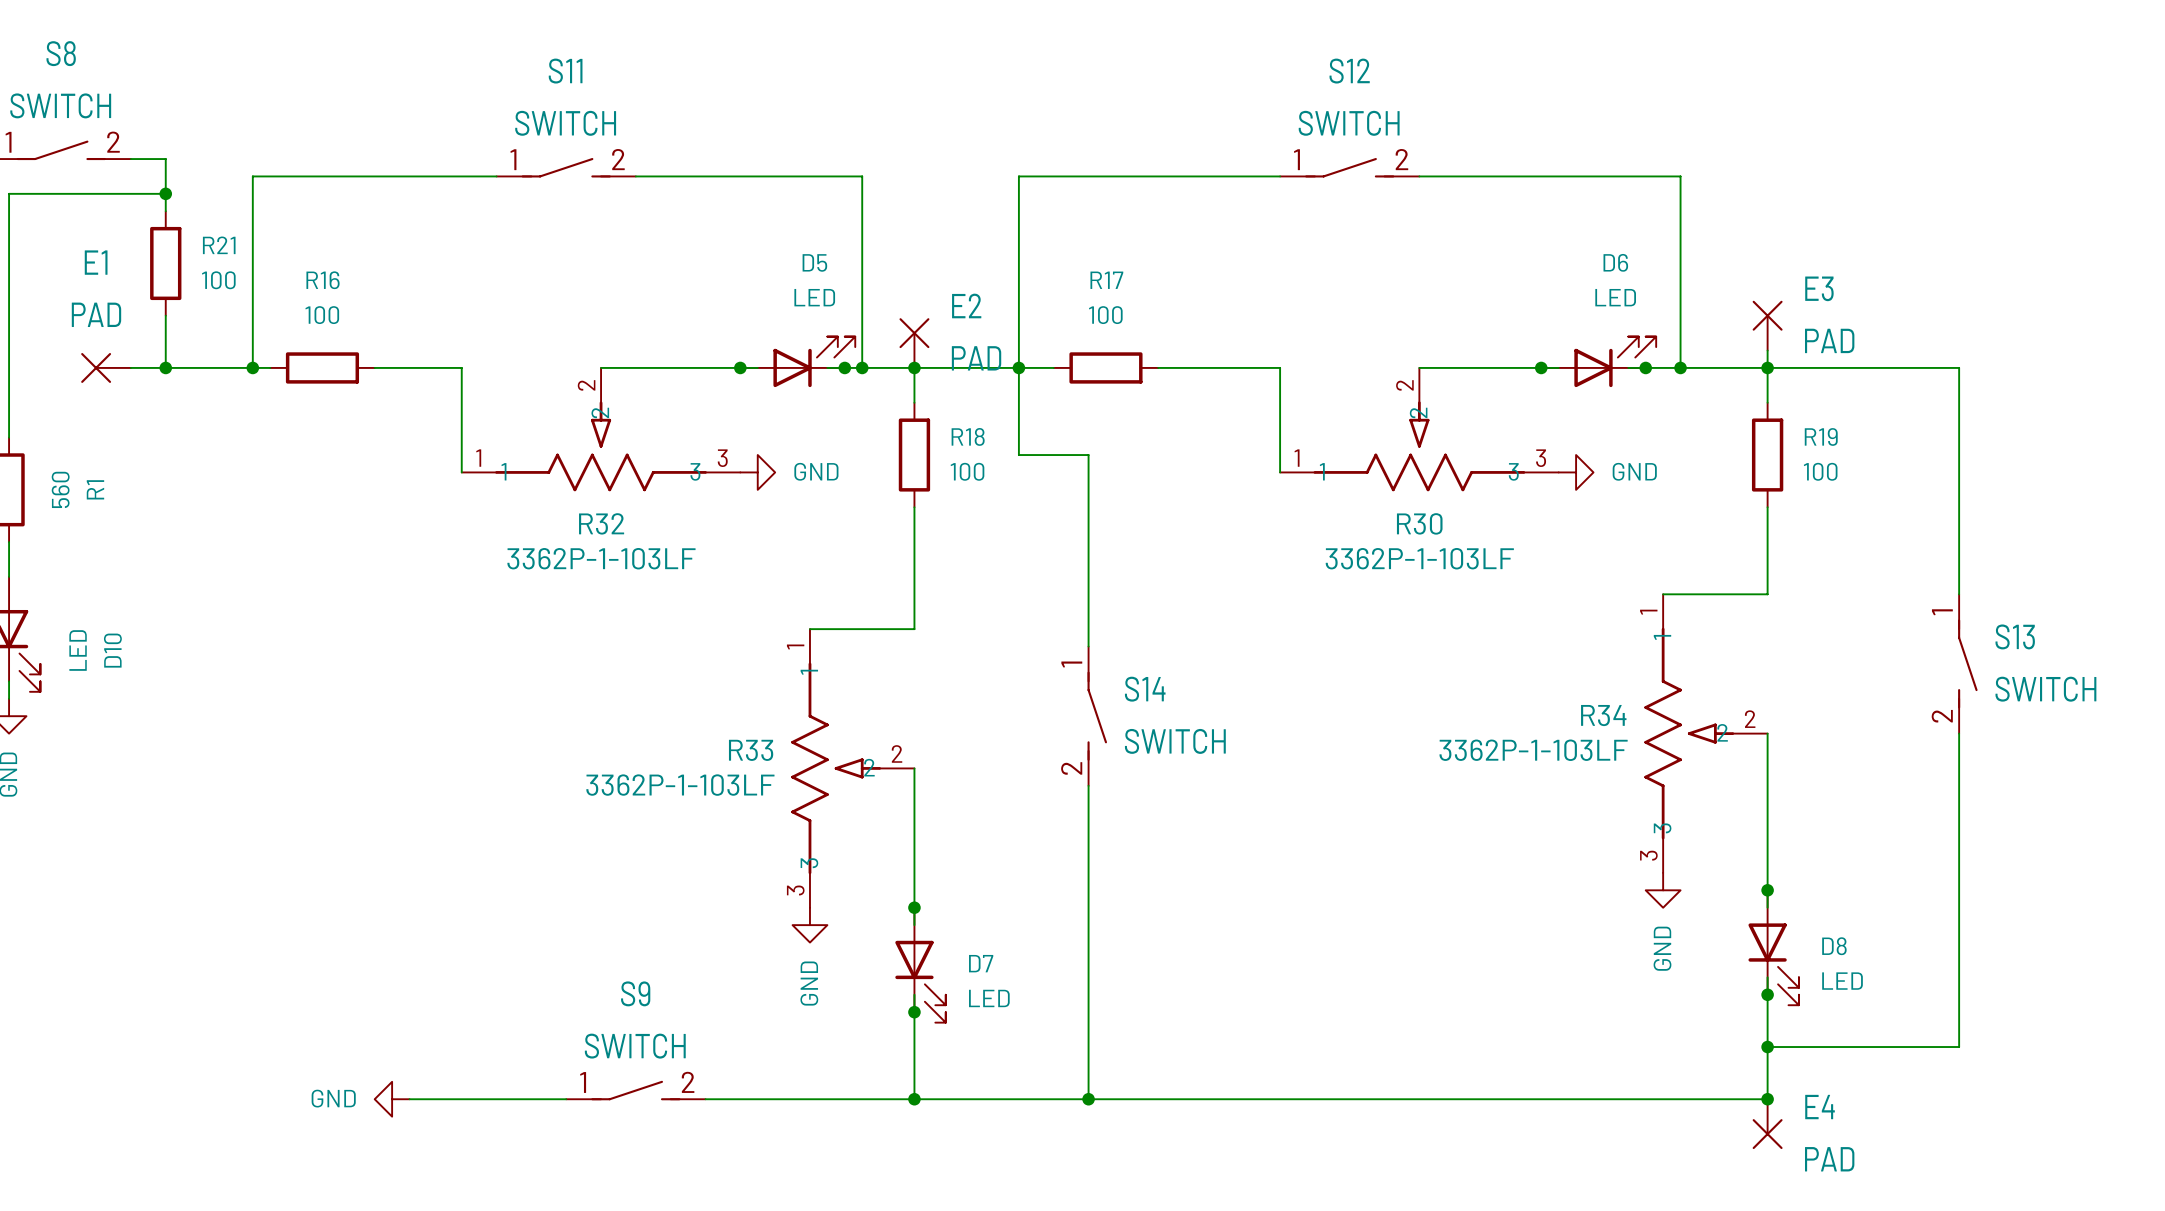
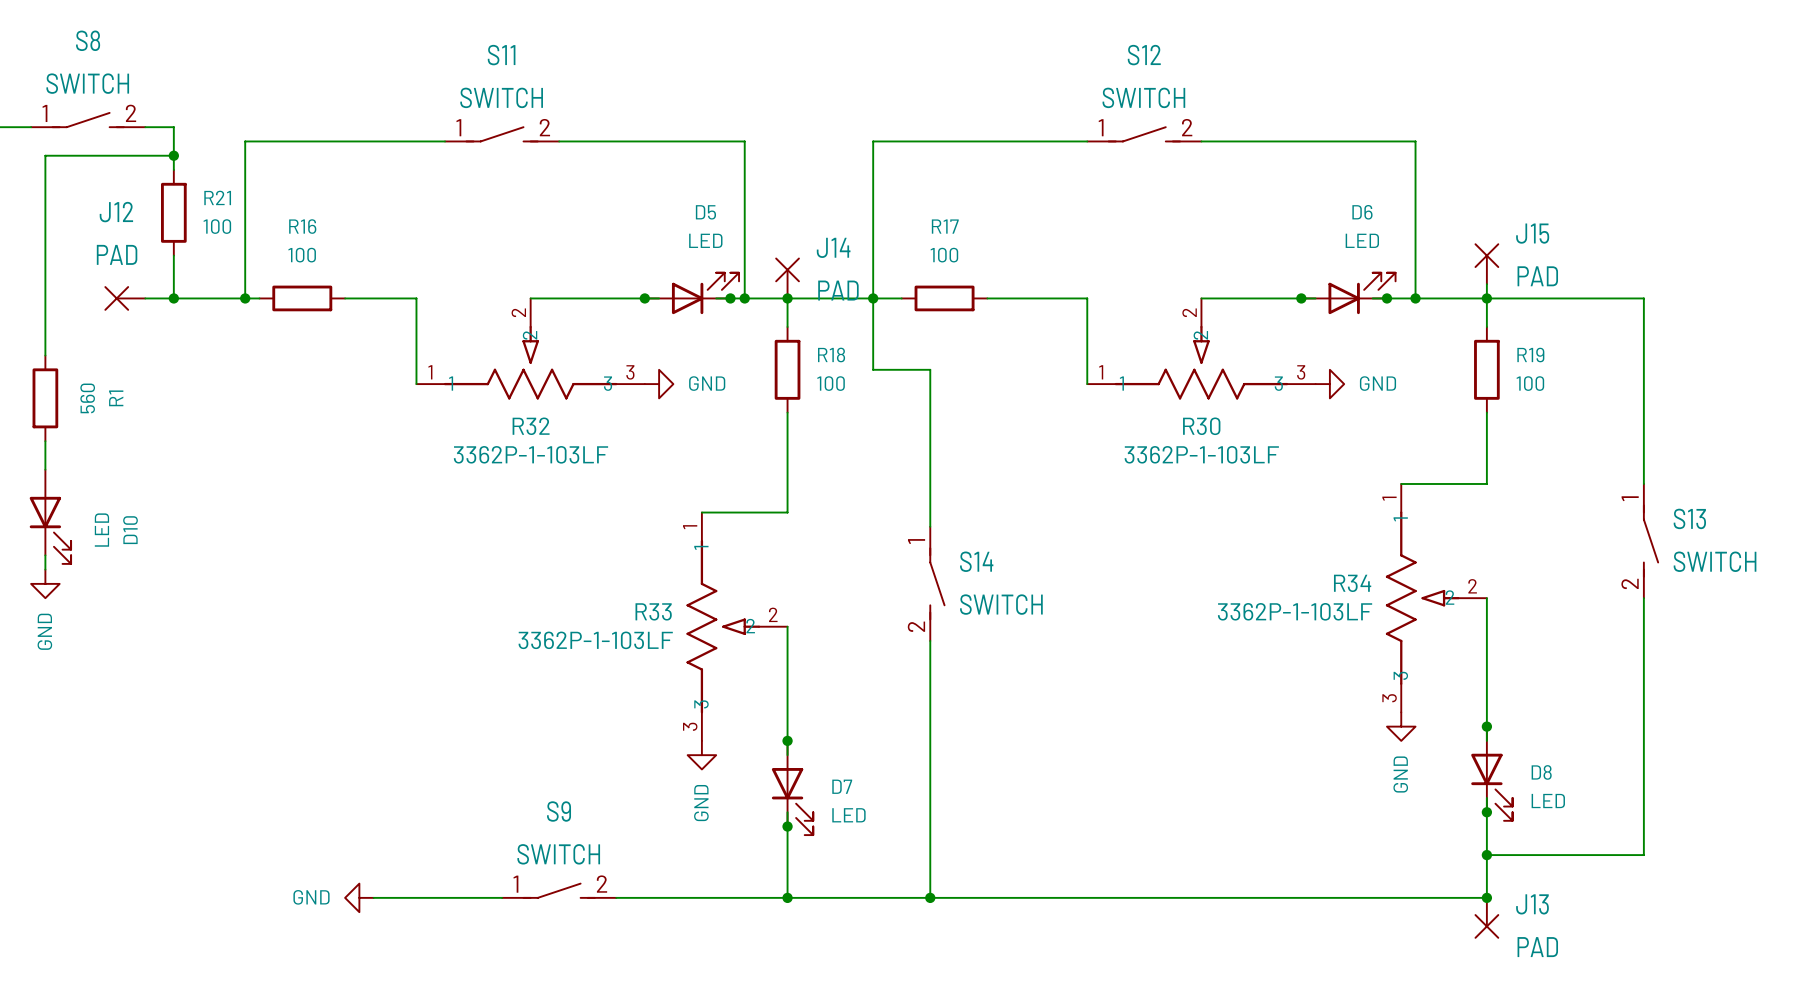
E1 name: E1 (96, 262) -> J12 (116, 212)
E3 name: E3 (1819, 288) -> J15 (1532, 233)
E2 name: E2 (966, 305) -> J14 (833, 247)
E4 name: E4 (1820, 1107) -> J13 (1532, 904)

